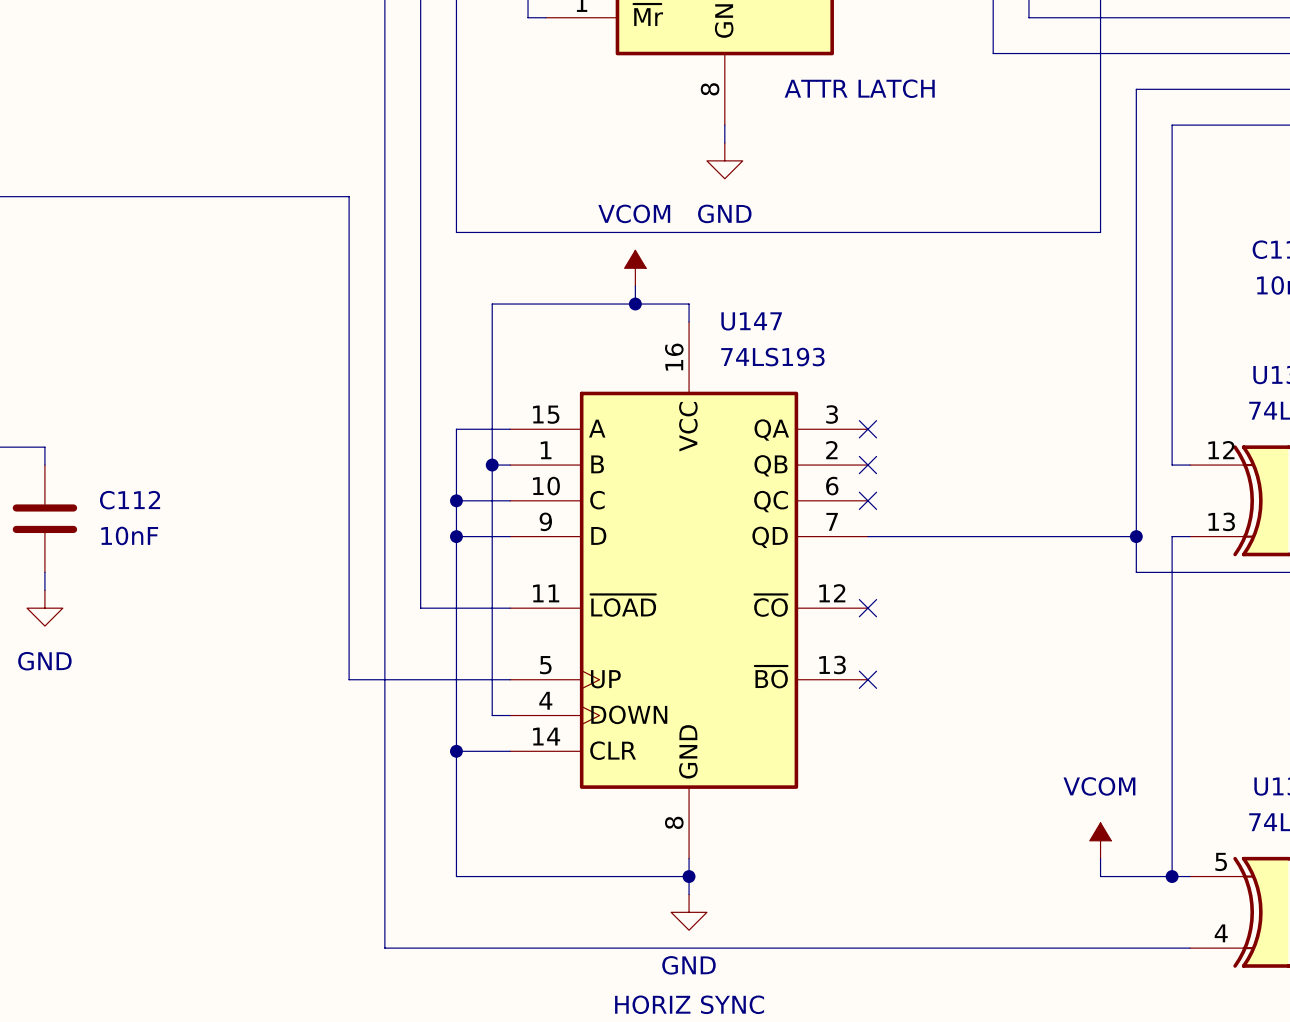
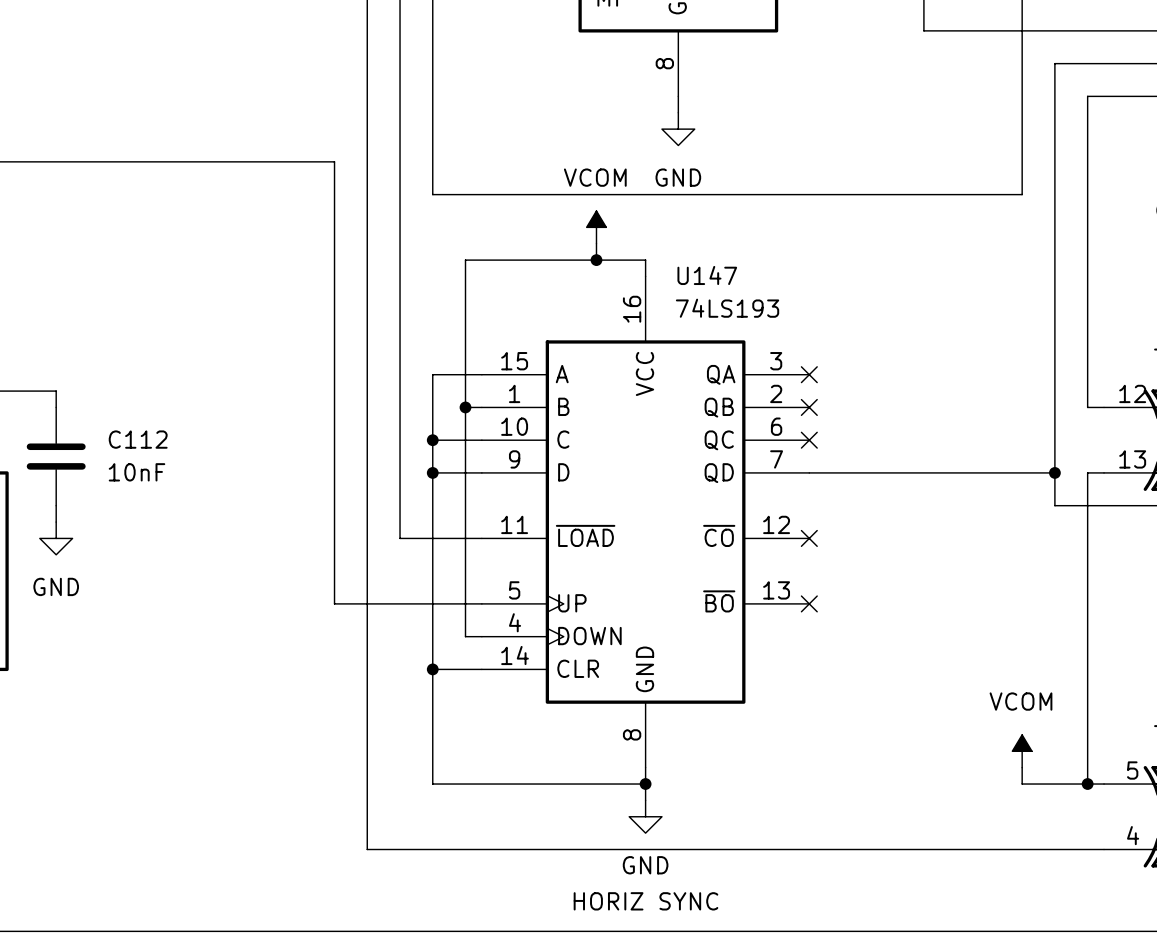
text: ATTR LATCH (859, 88) -> none

